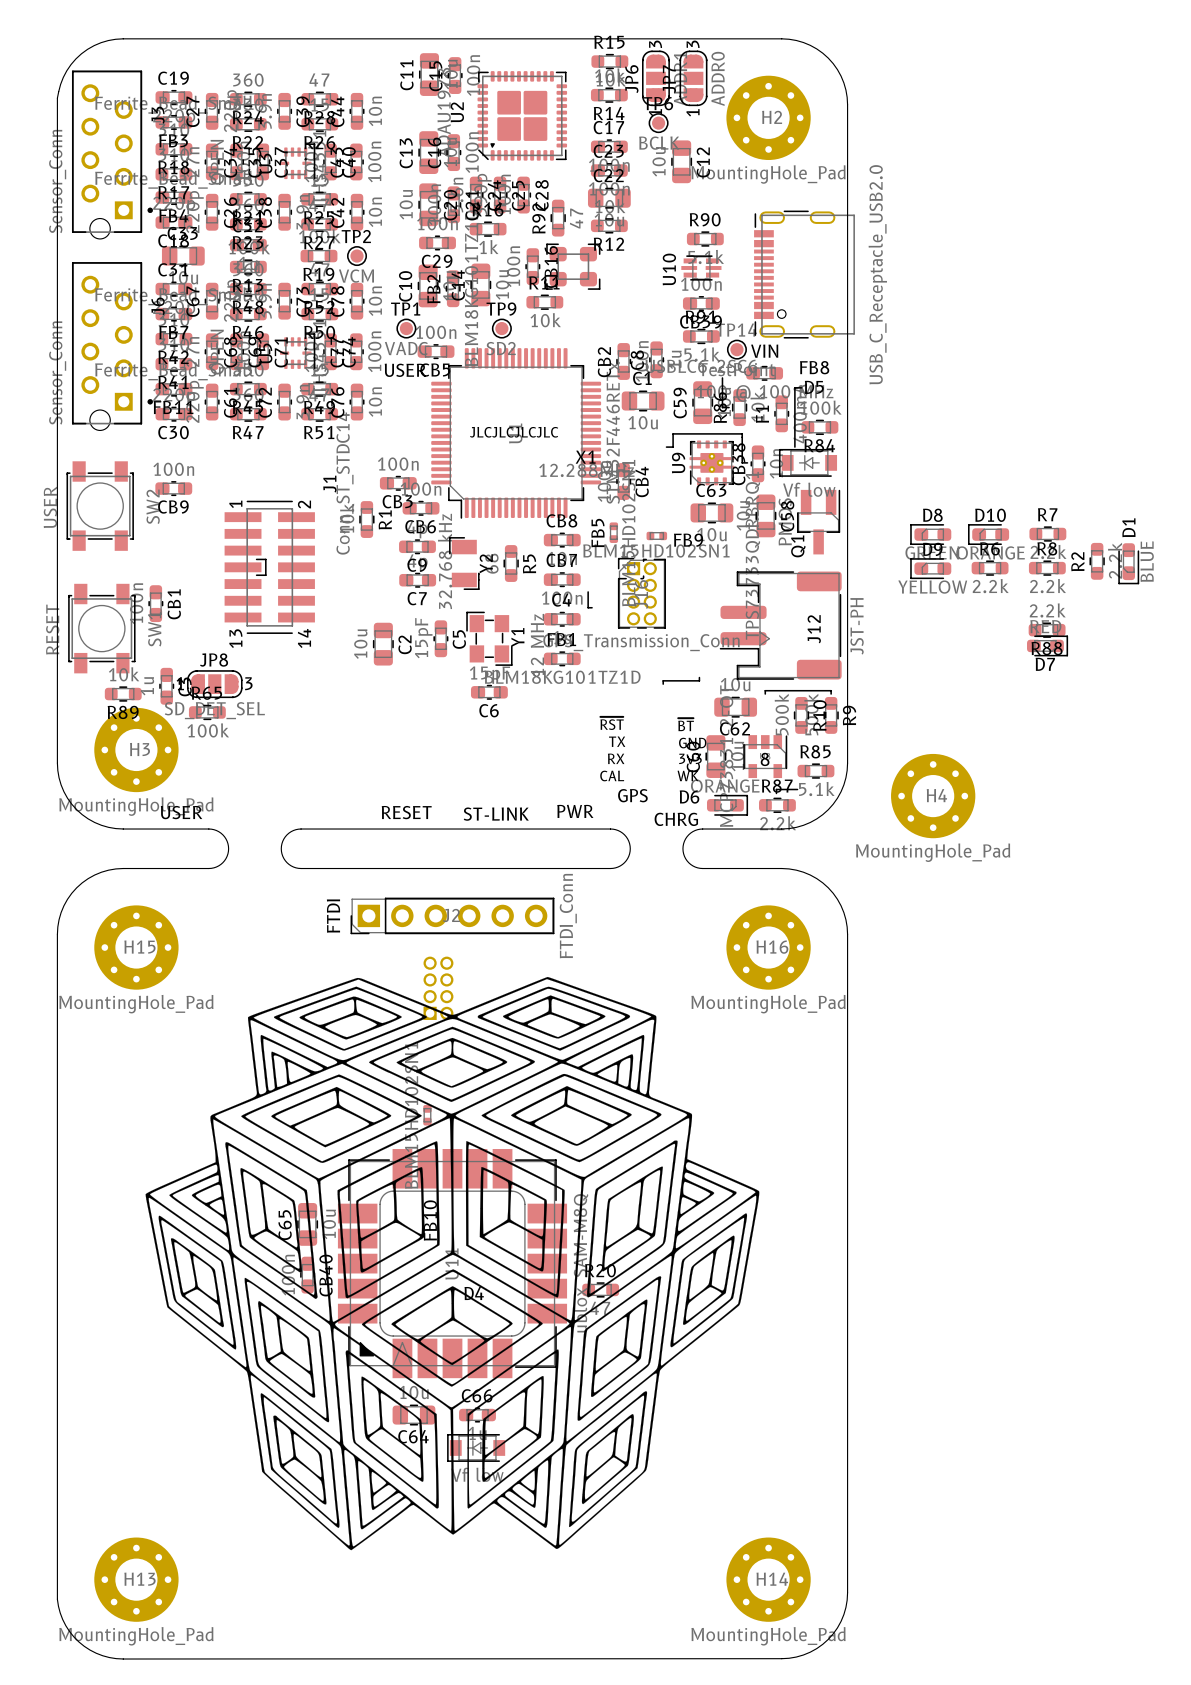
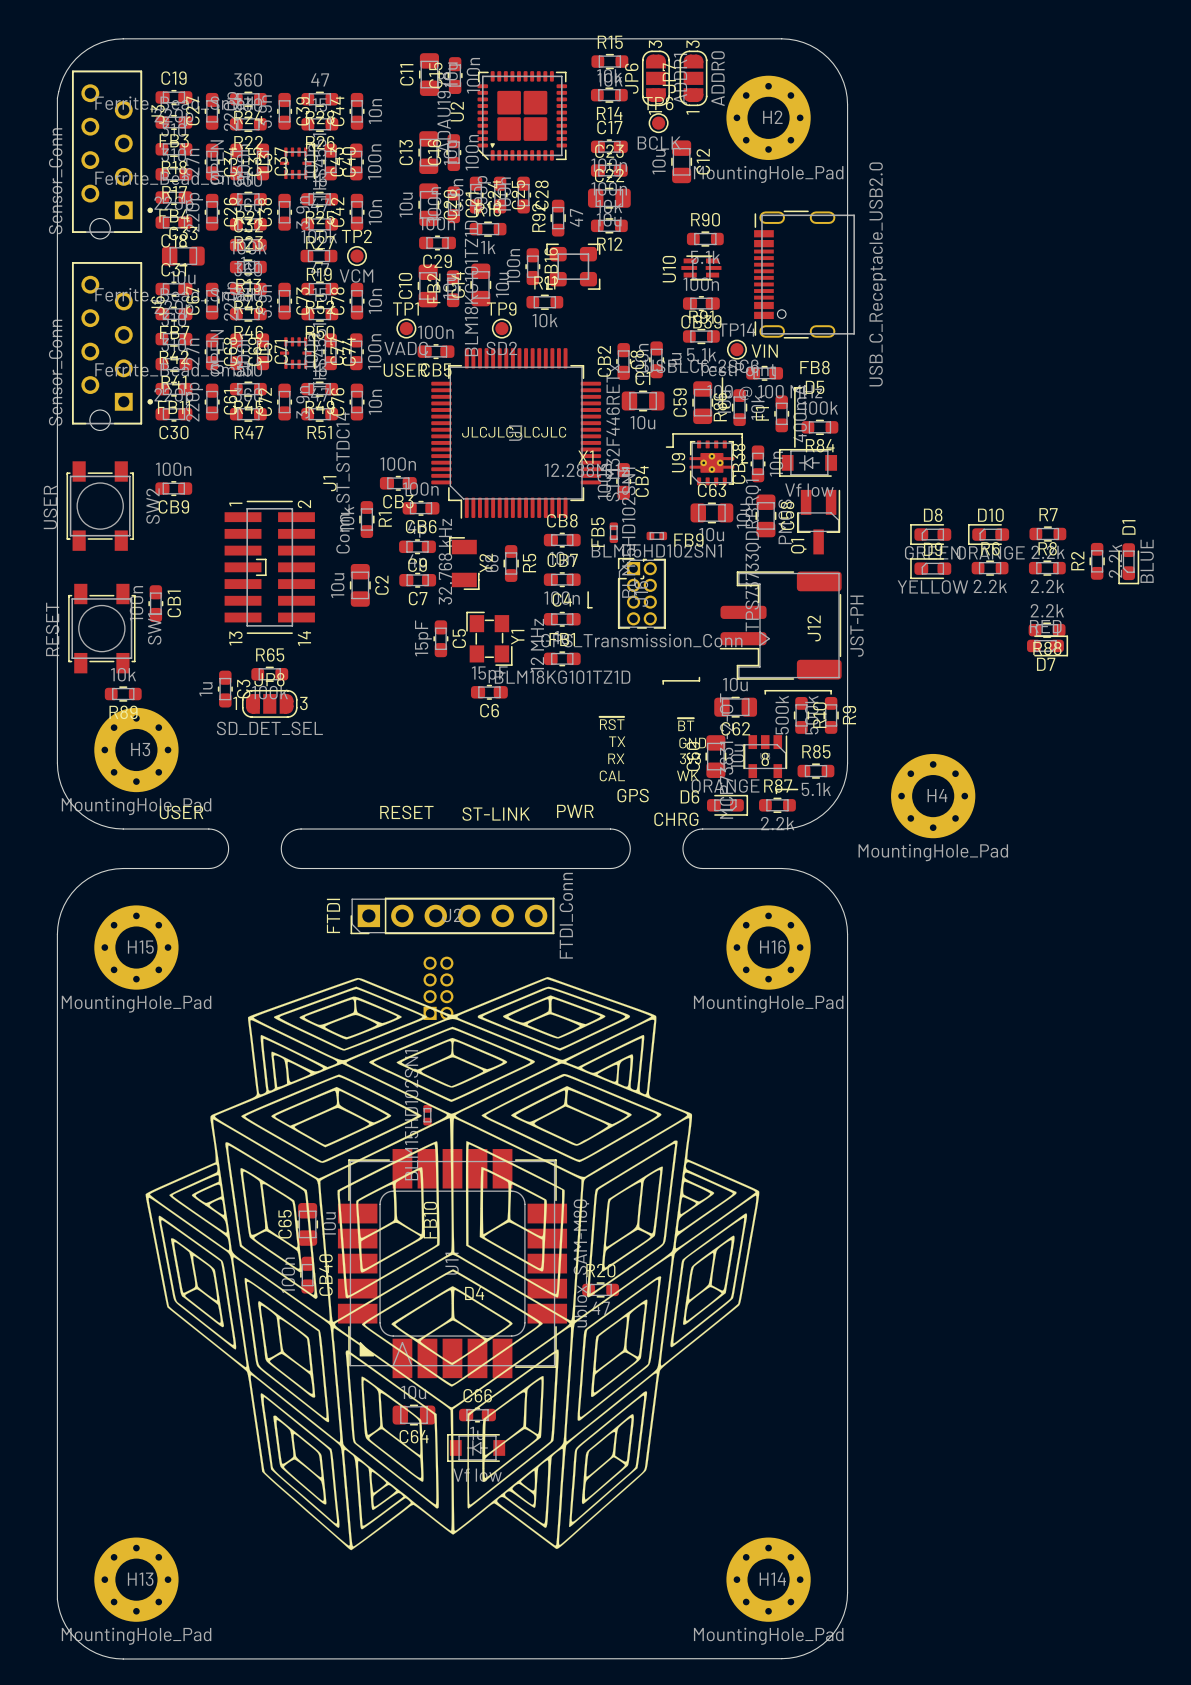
C2 position: (383, 644) -> (360, 585)
JP8 position: (214, 684) -> (269, 703)
C3 position: (166, 686) -> (225, 689)
R65 position: (207, 712) -> (269, 674)

